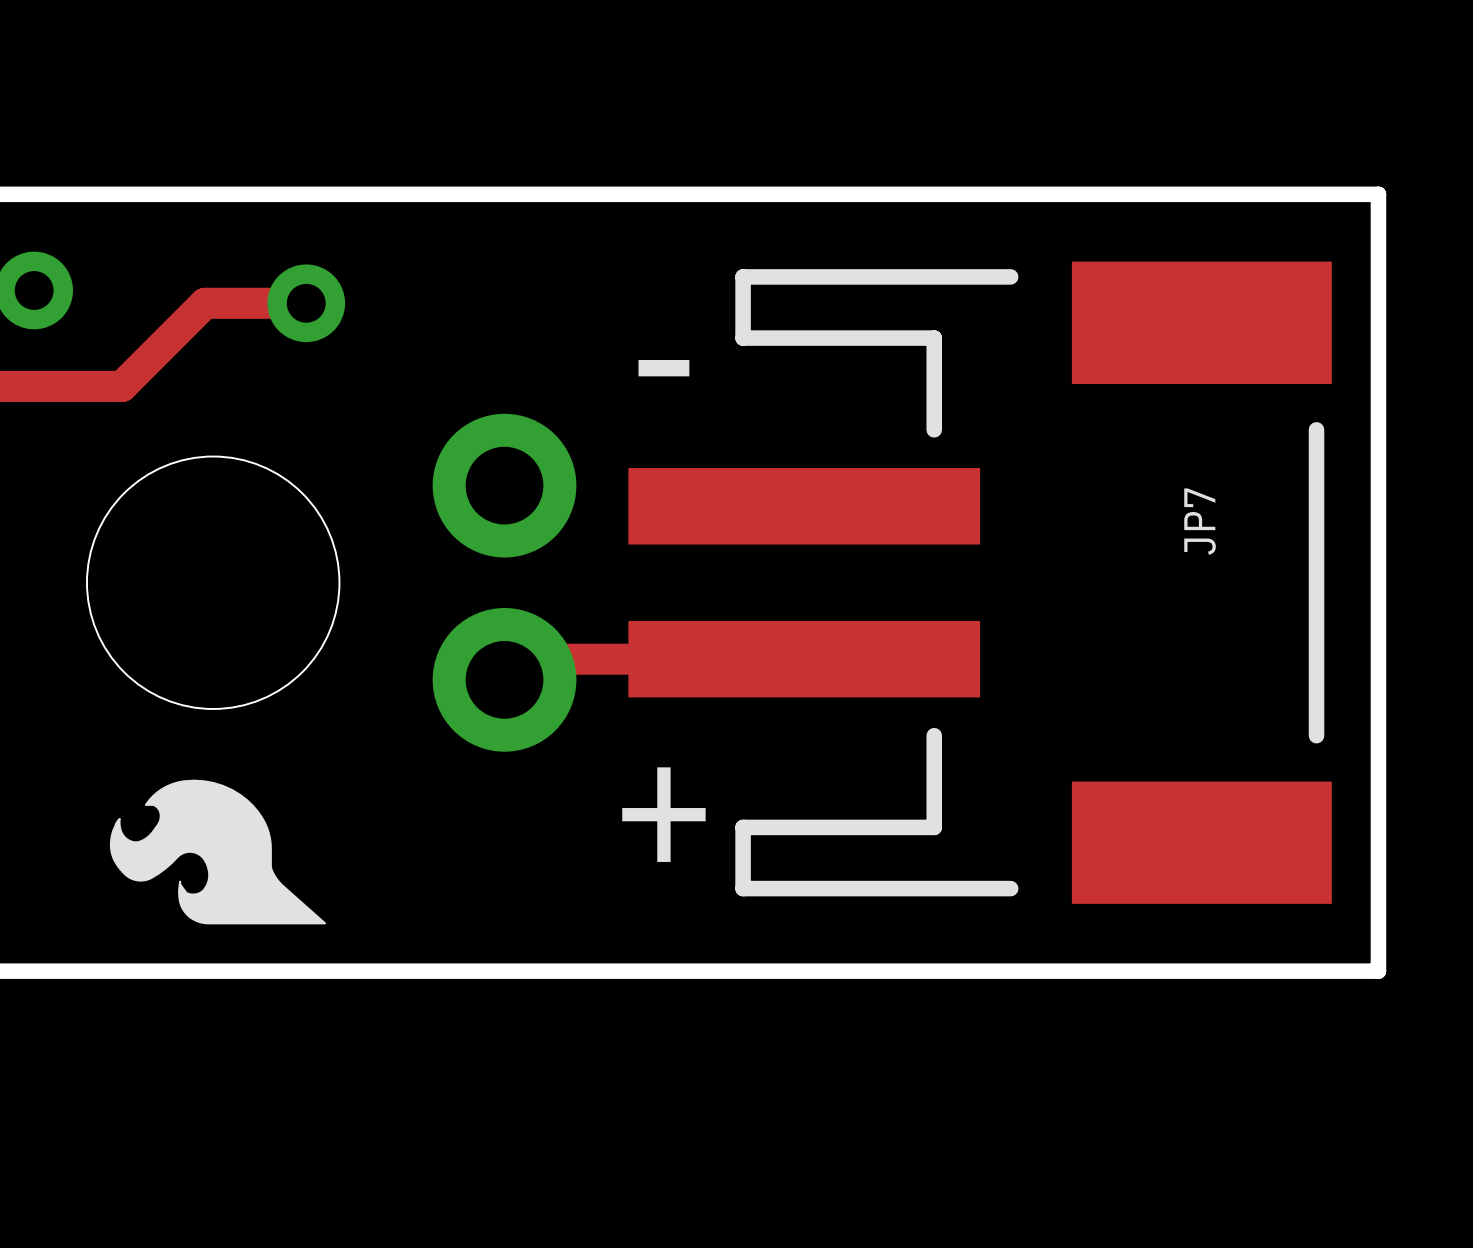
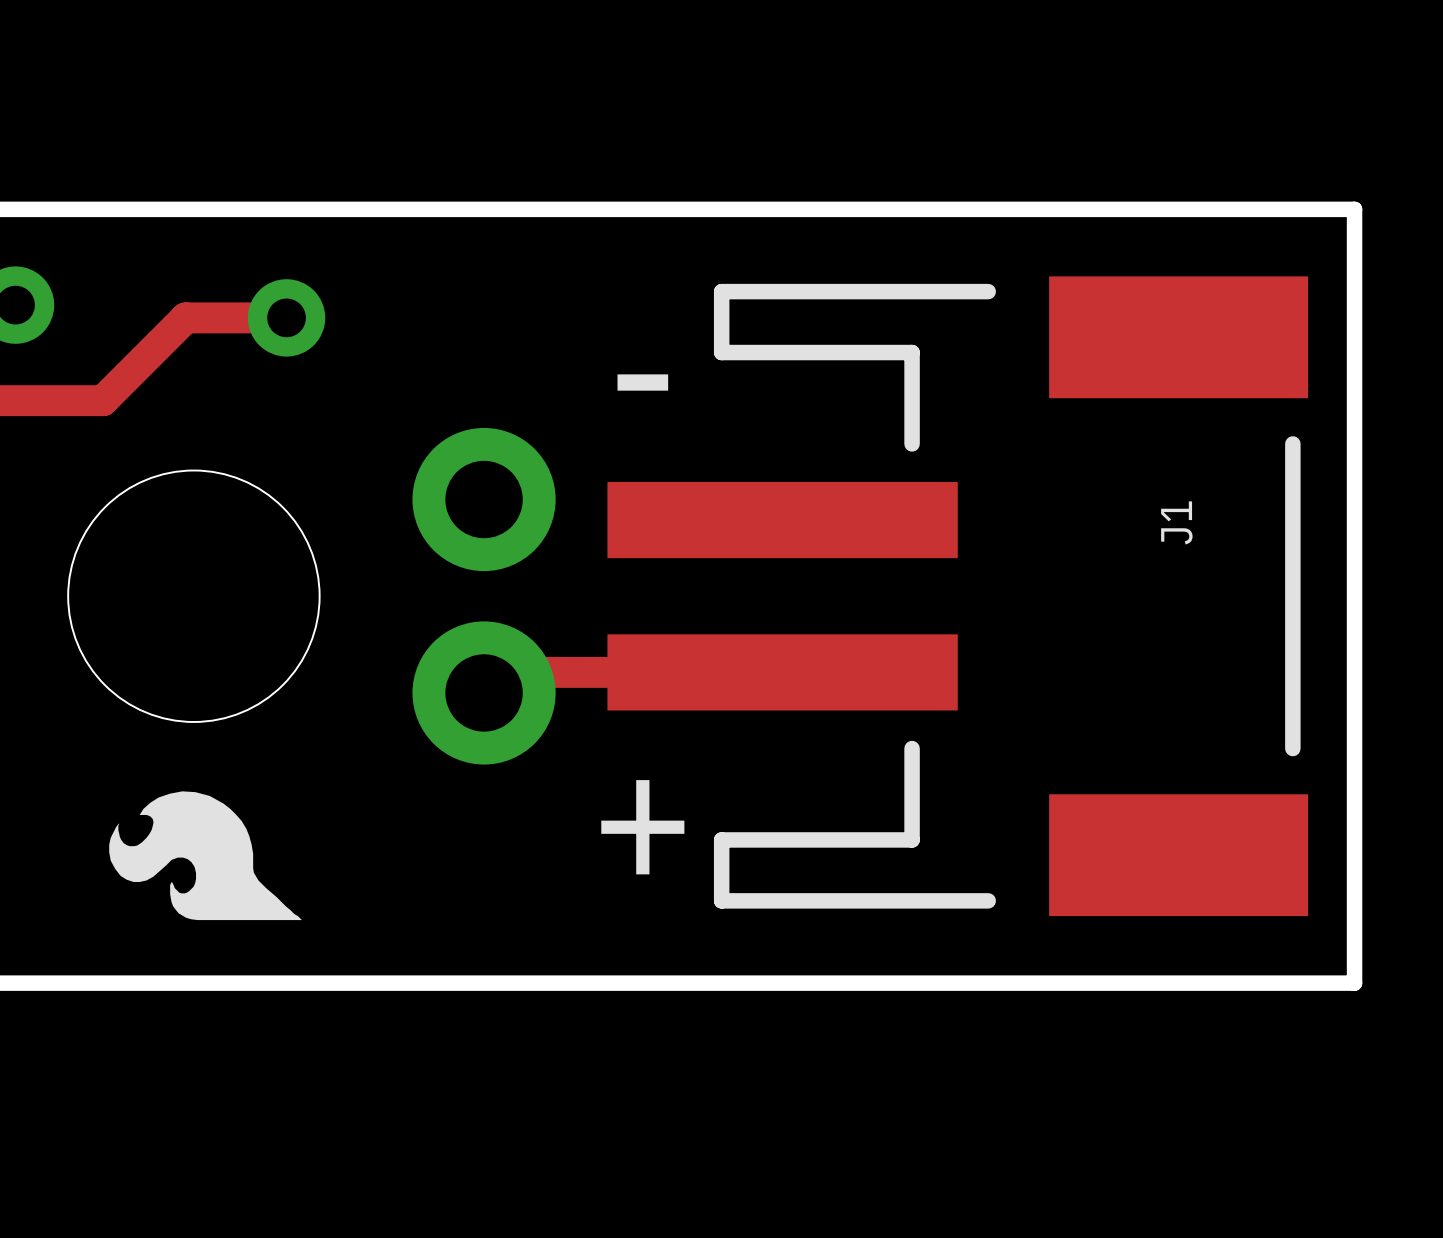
JP7 name: JP7 (1200, 521) -> J1 (1176, 522)
drawing shape: [109, 779, 327, 925] -> [109, 791, 303, 921]

